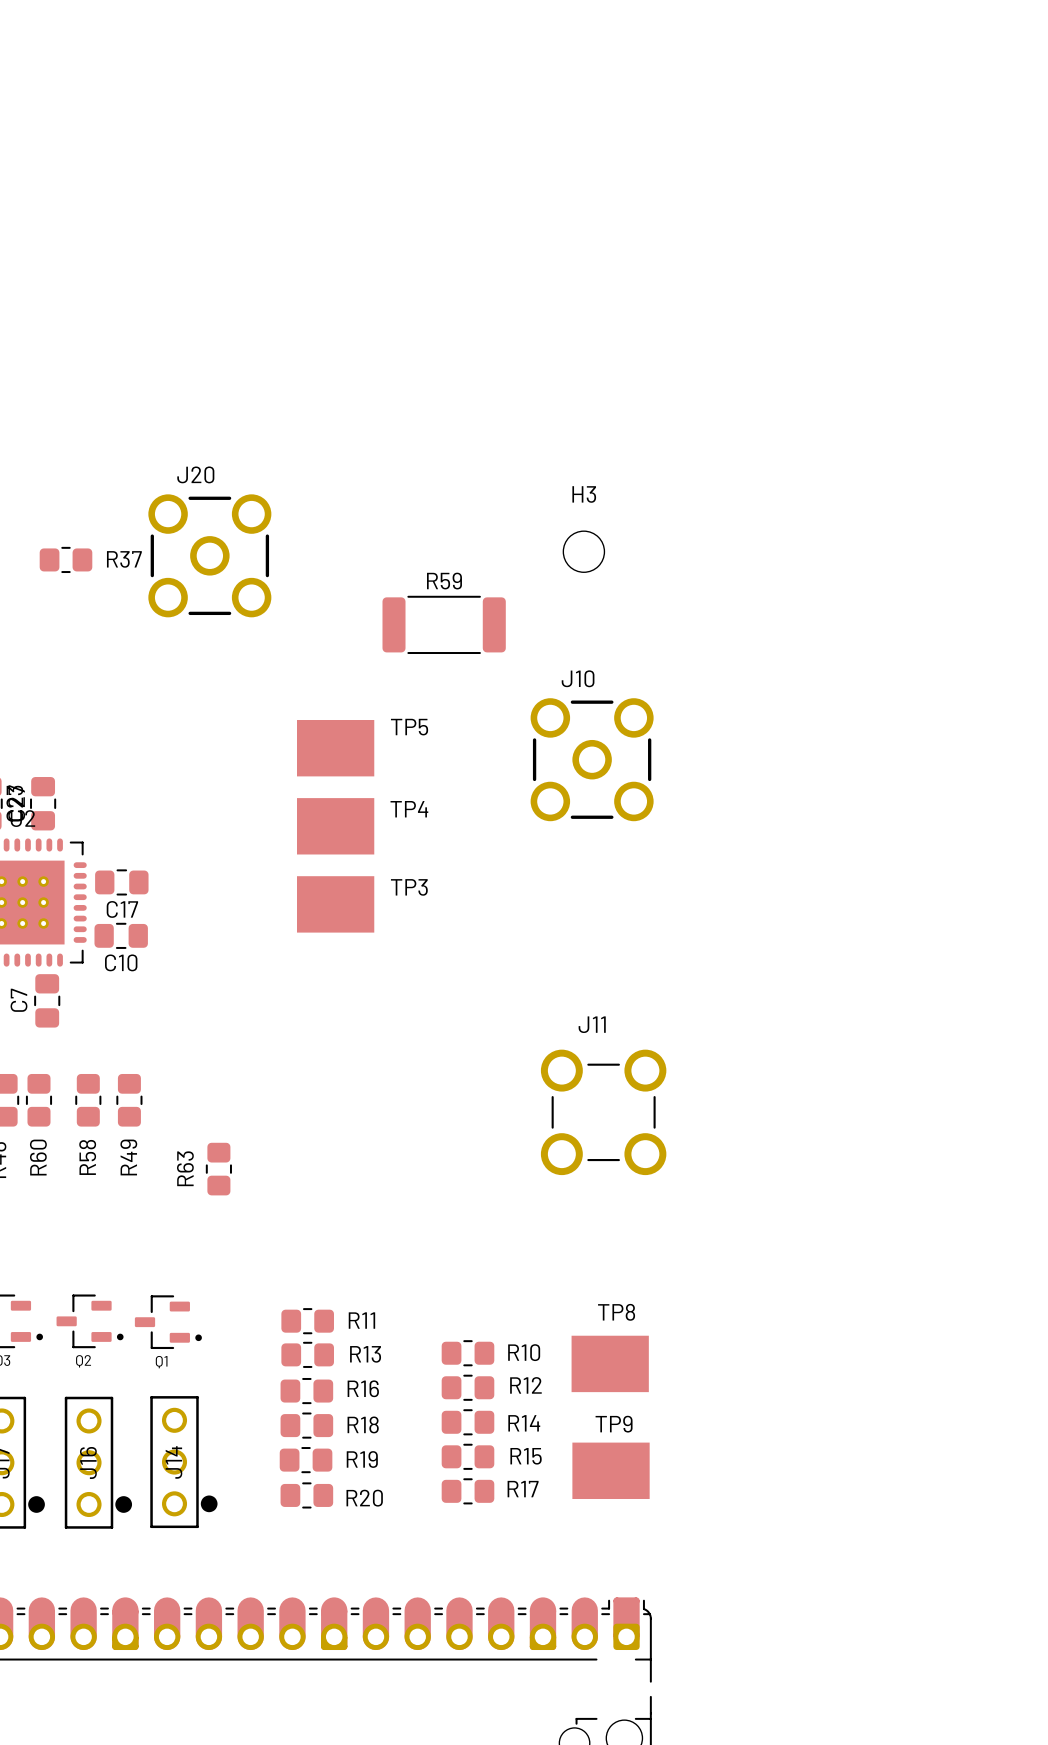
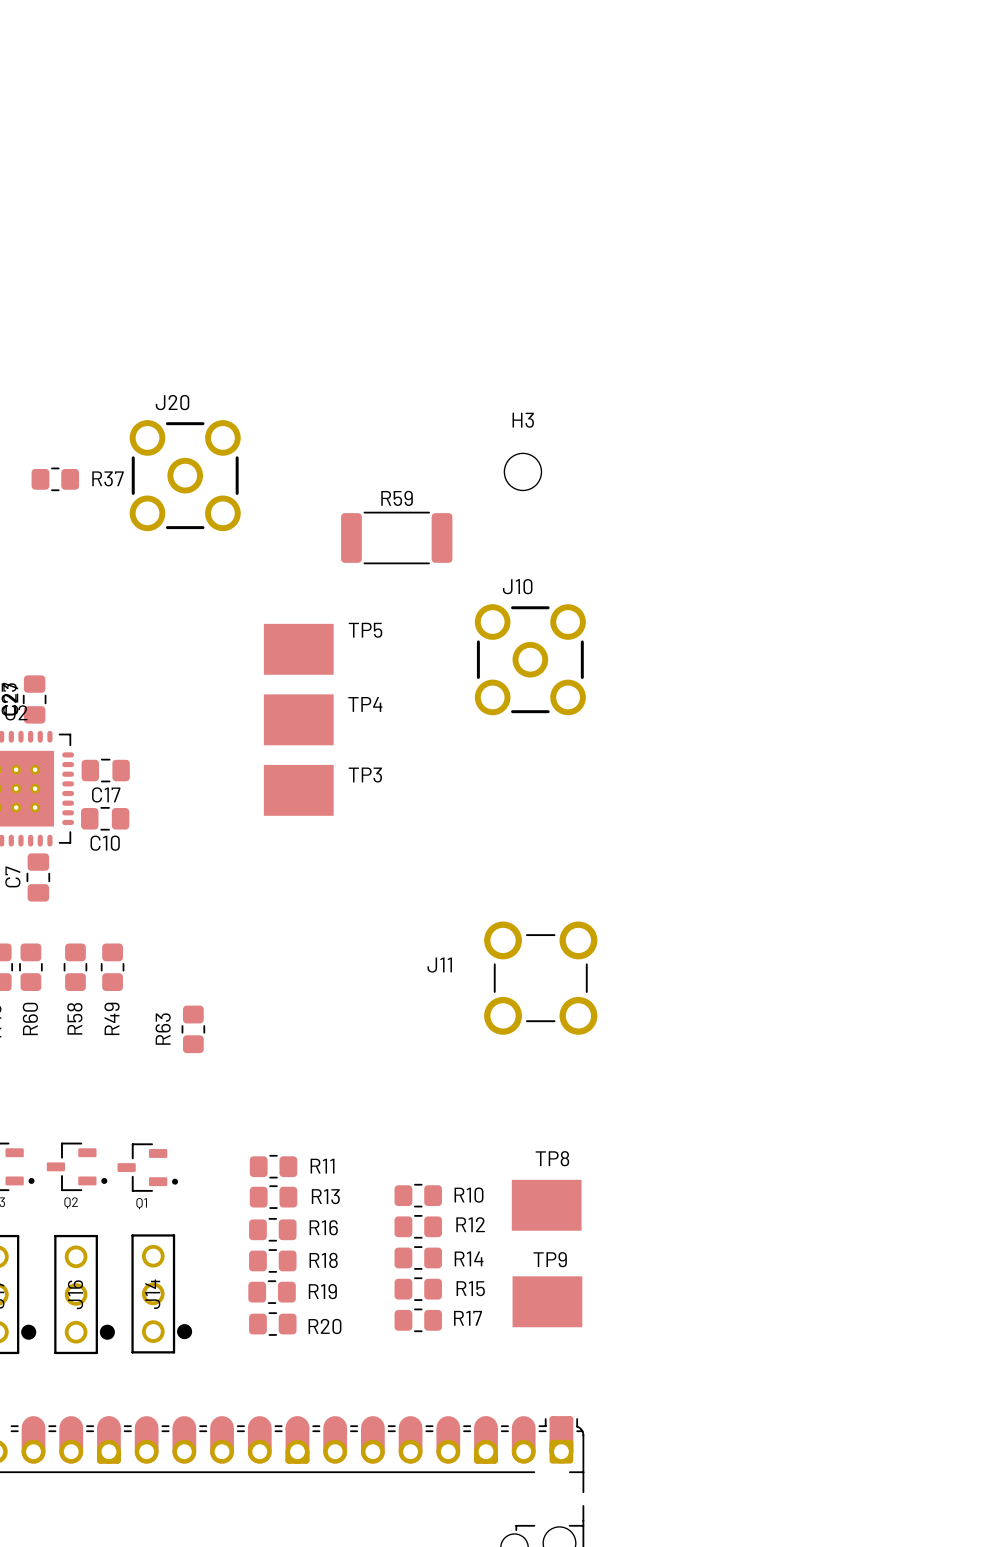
J11 name position: J11 (592, 1024) -> J11 (439, 965)

